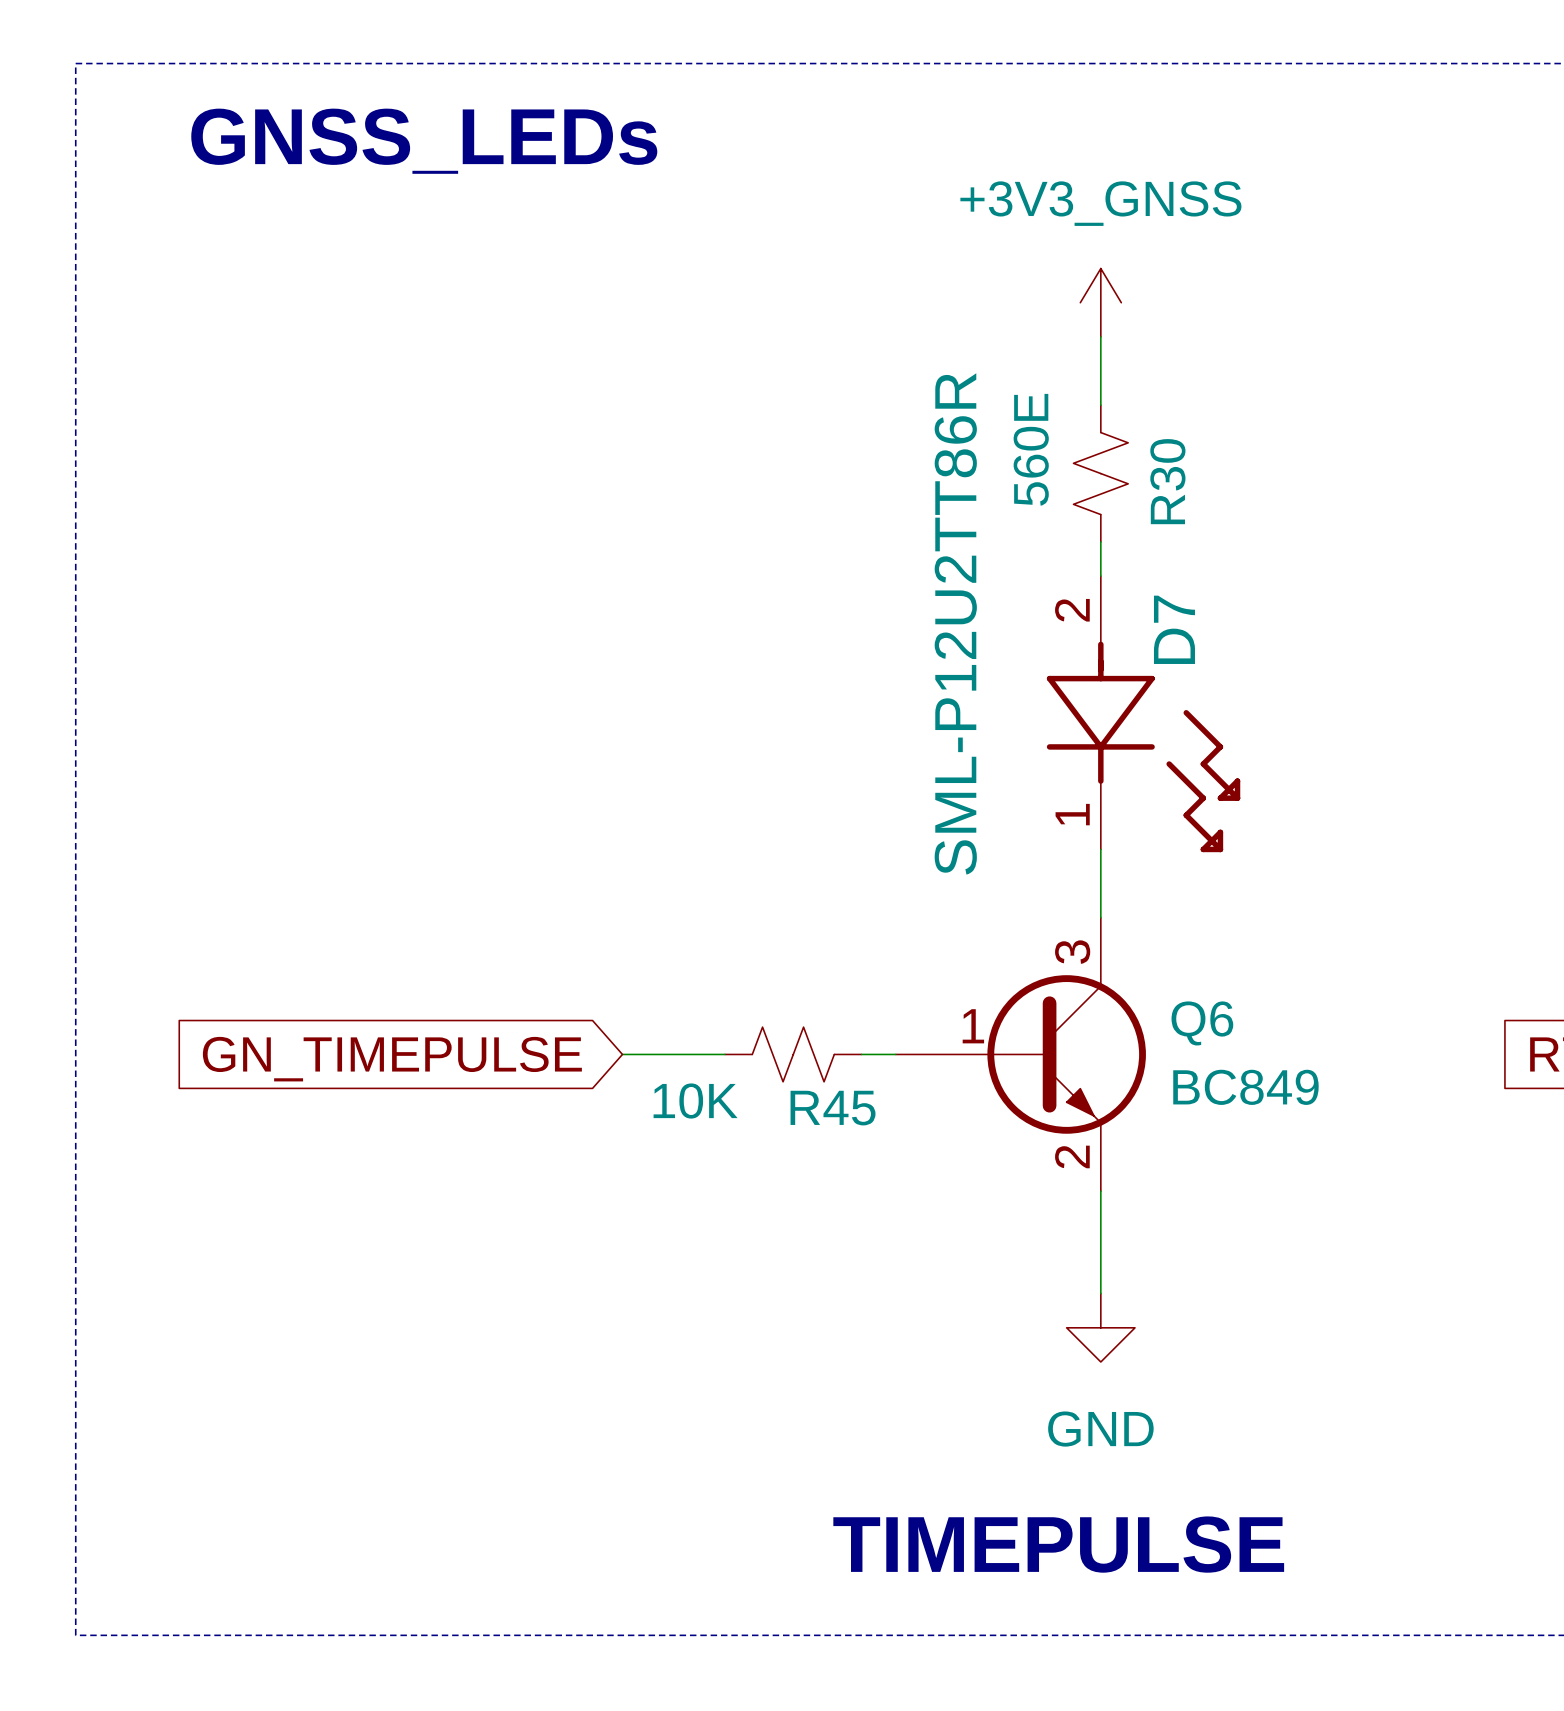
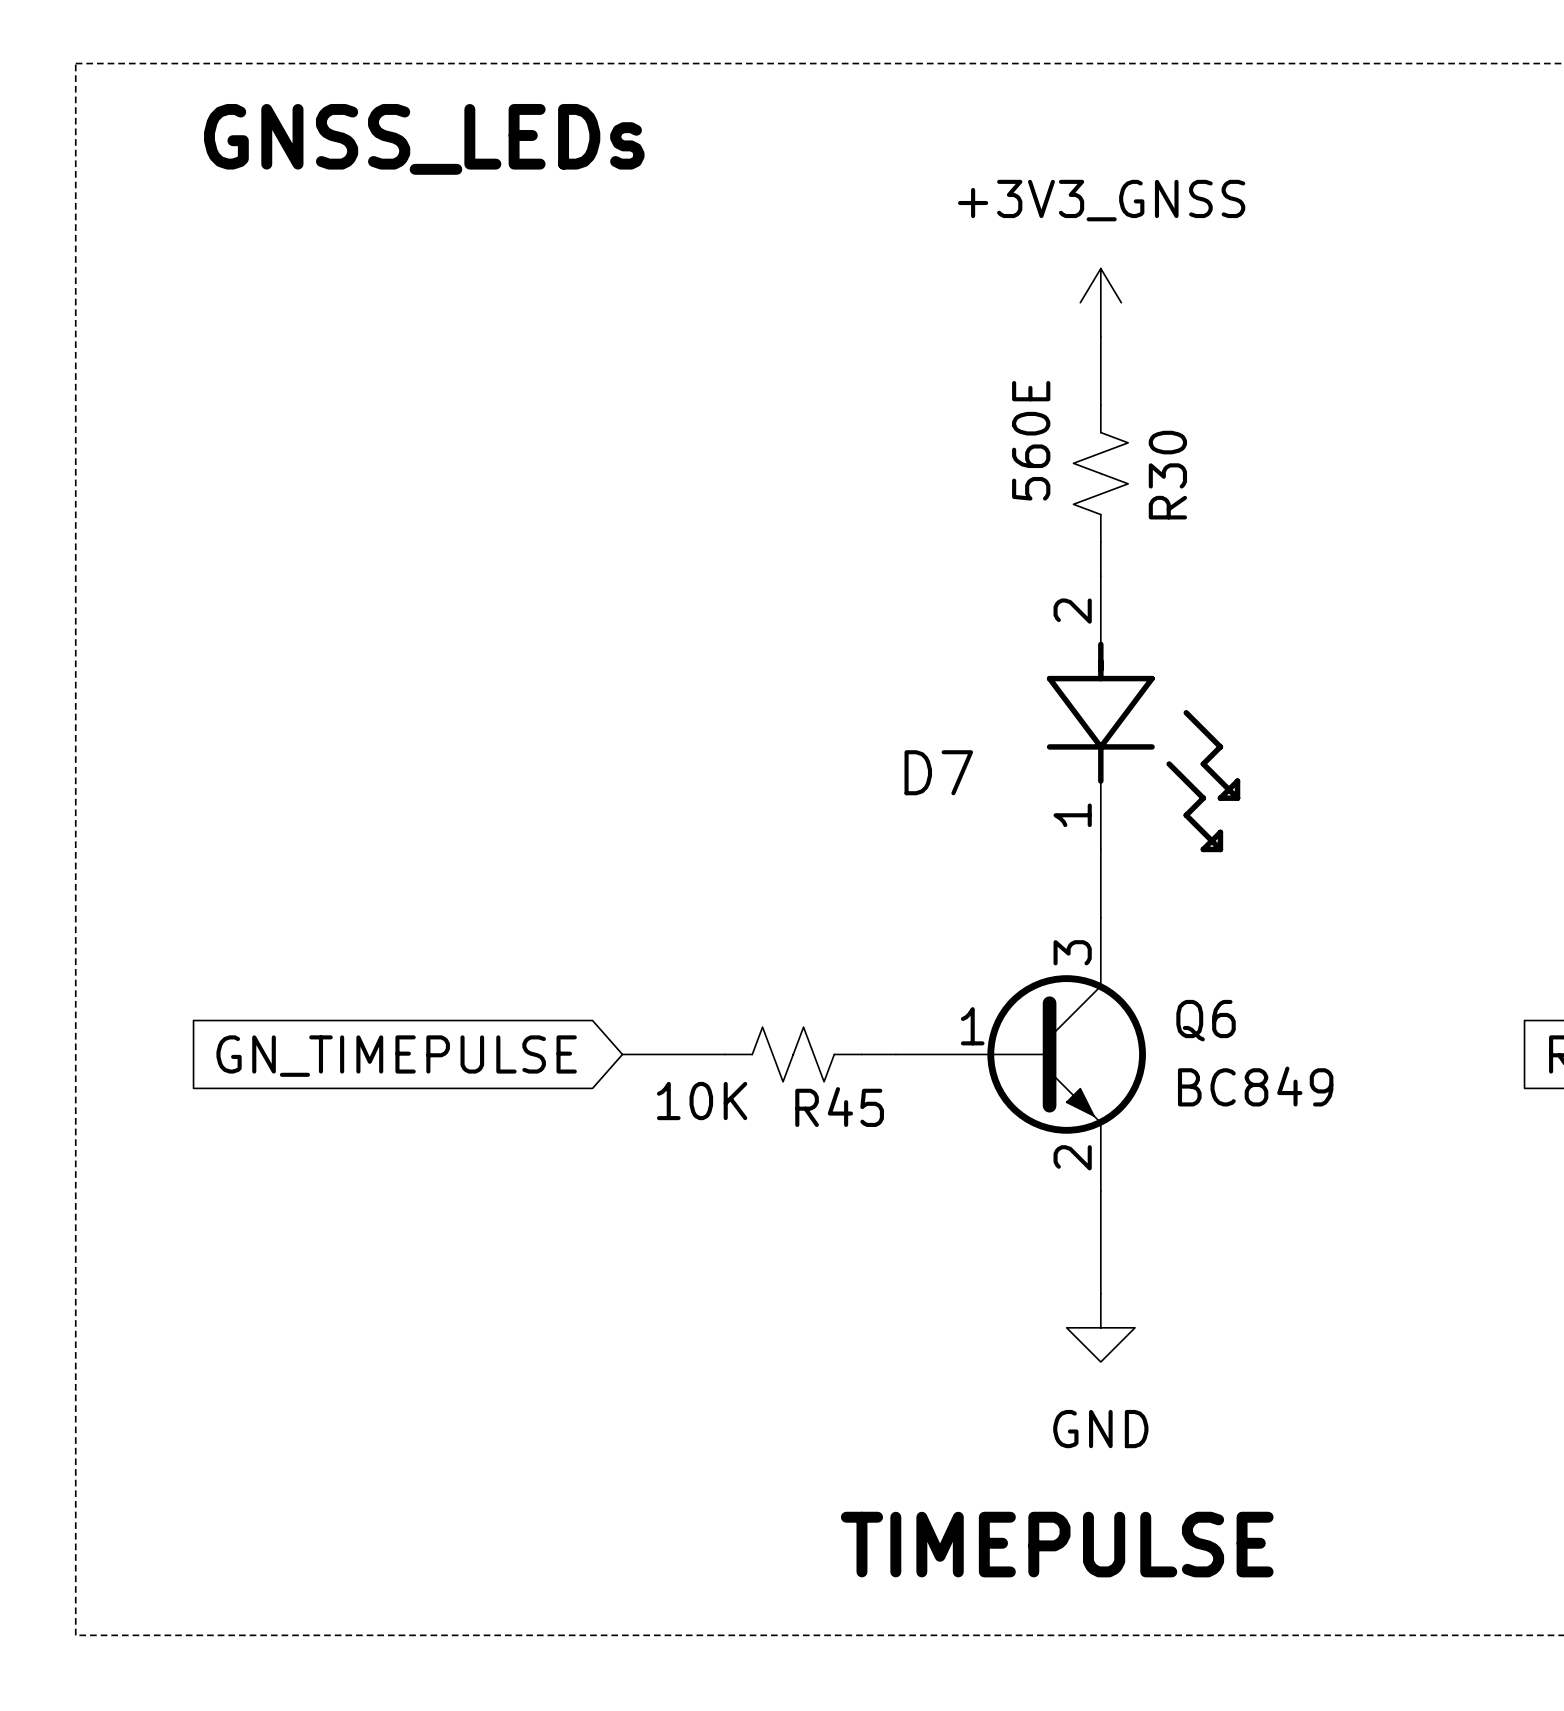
D7 value: SML-P12U2TT86R (955, 623) -> none
D7 name rotation: 0° (1174, 629) -> 90° clockwise (938, 772)
D7 name position: D7 (1174, 629) -> D7 (938, 772)

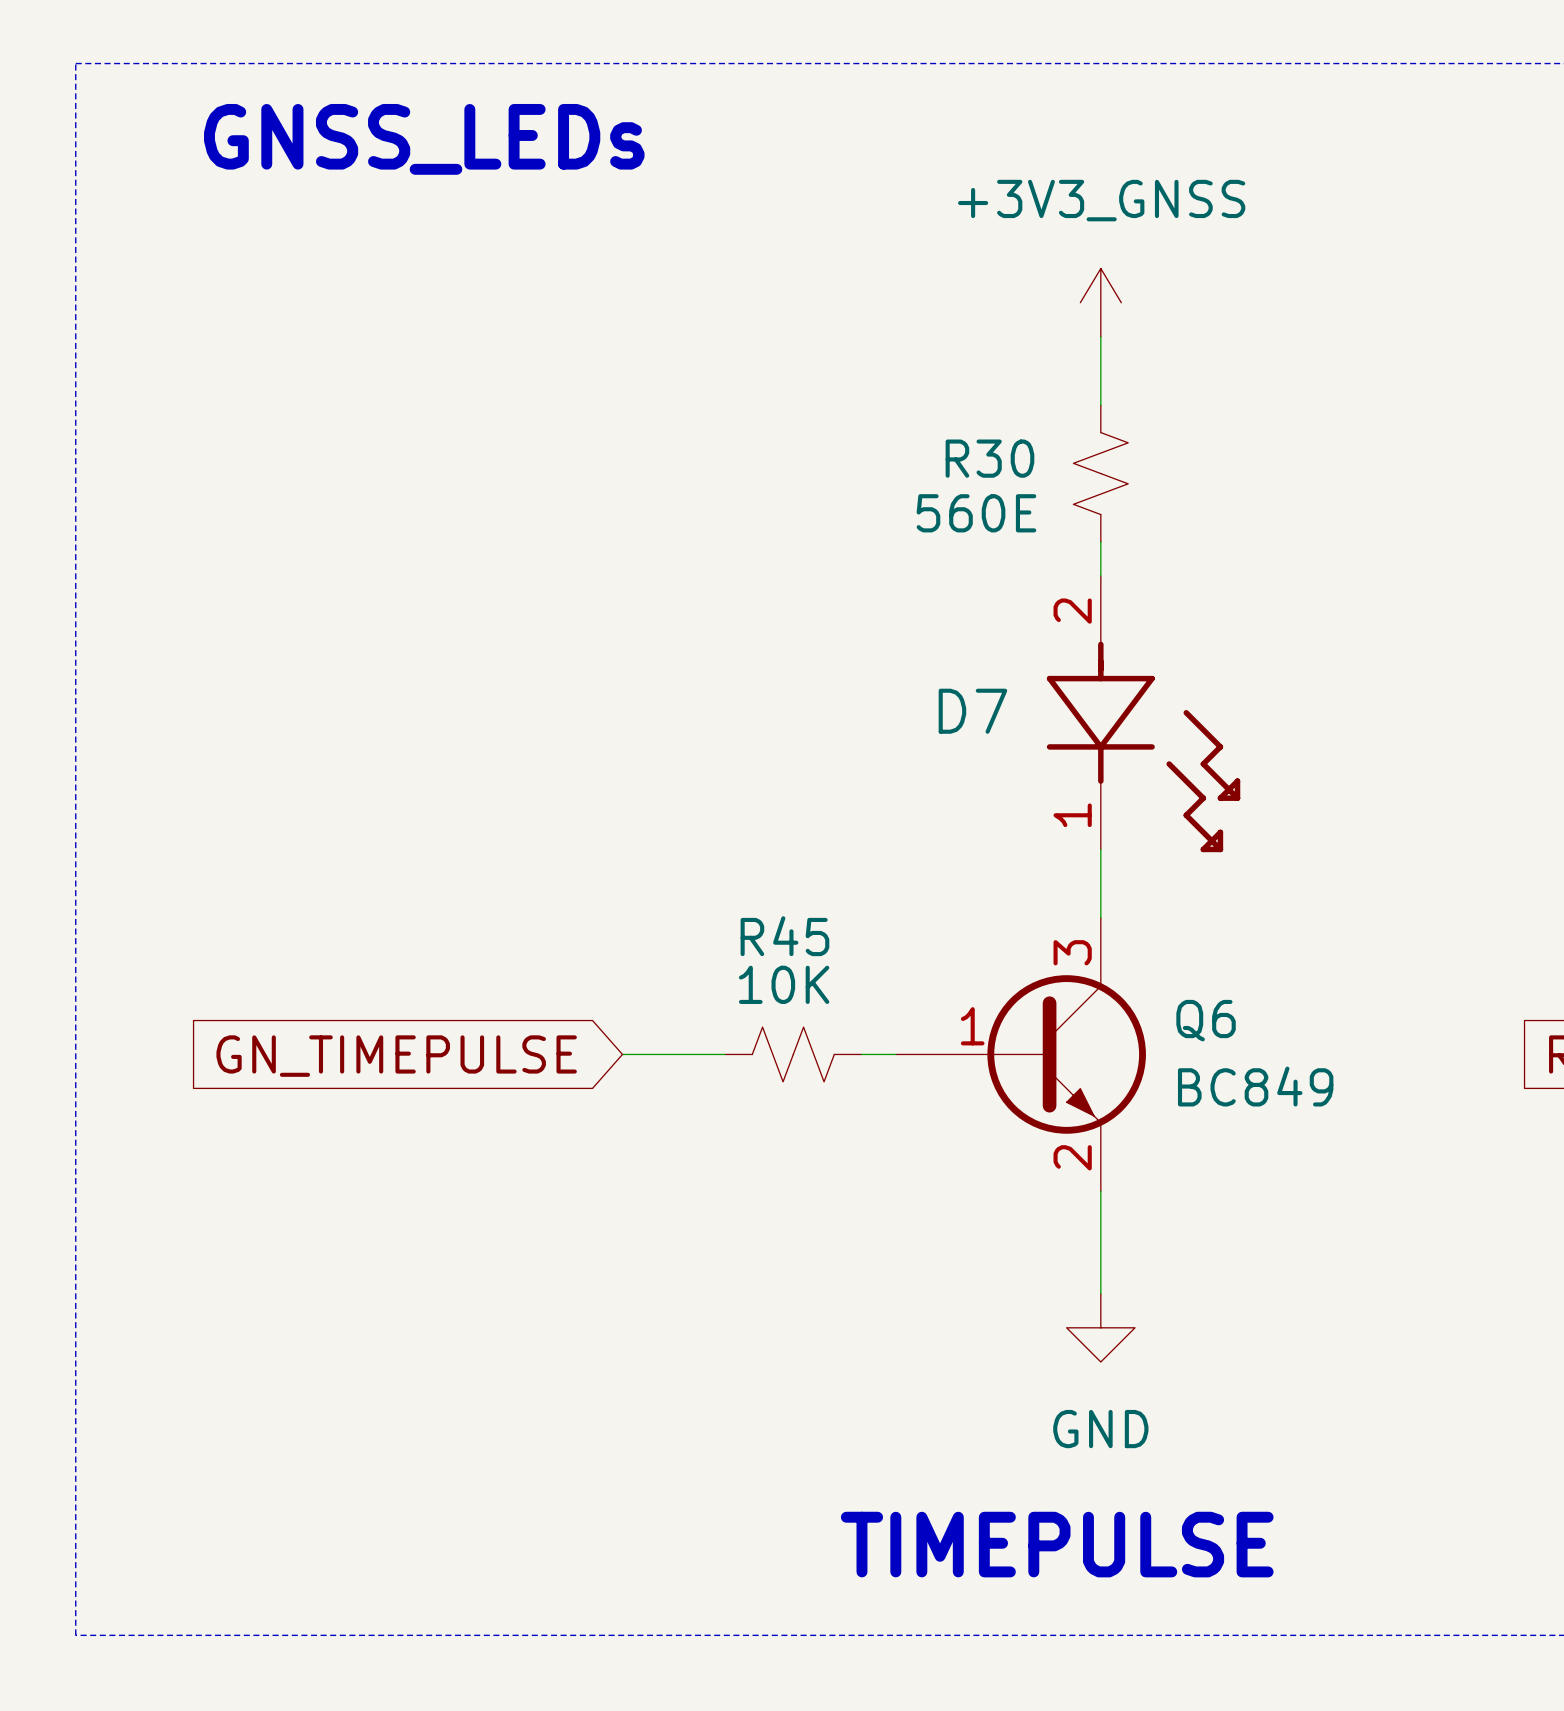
R30 value rotation: 0° (1031, 440) -> 90° clockwise (976, 513)
R30 name rotation: 0° (1167, 475) -> 90° clockwise (989, 458)
R30 name position: R30 (1167, 475) -> R30 (989, 458)
D7 name position: D7 (938, 772) -> D7 (972, 711)
R45 value position: 10K (702, 1101) -> 10K (784, 984)
R45 name position: R45 (839, 1107) -> R45 (784, 936)

